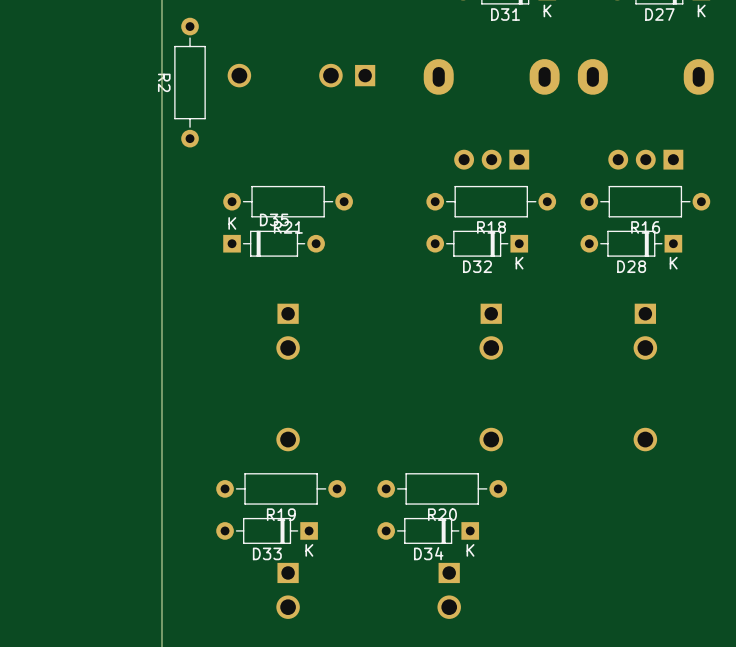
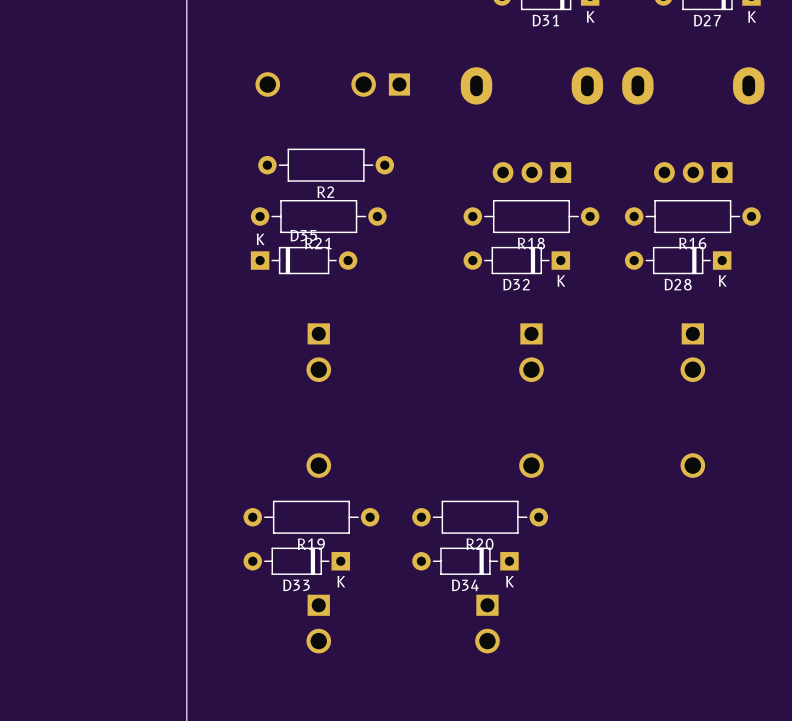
R2 name position: R2 (164, 82) -> R2 (325, 192)
R2 rotation: 0° (190, 82) -> 90° clockwise (326, 165)
R2 position: (190, 82) -> (326, 165)

